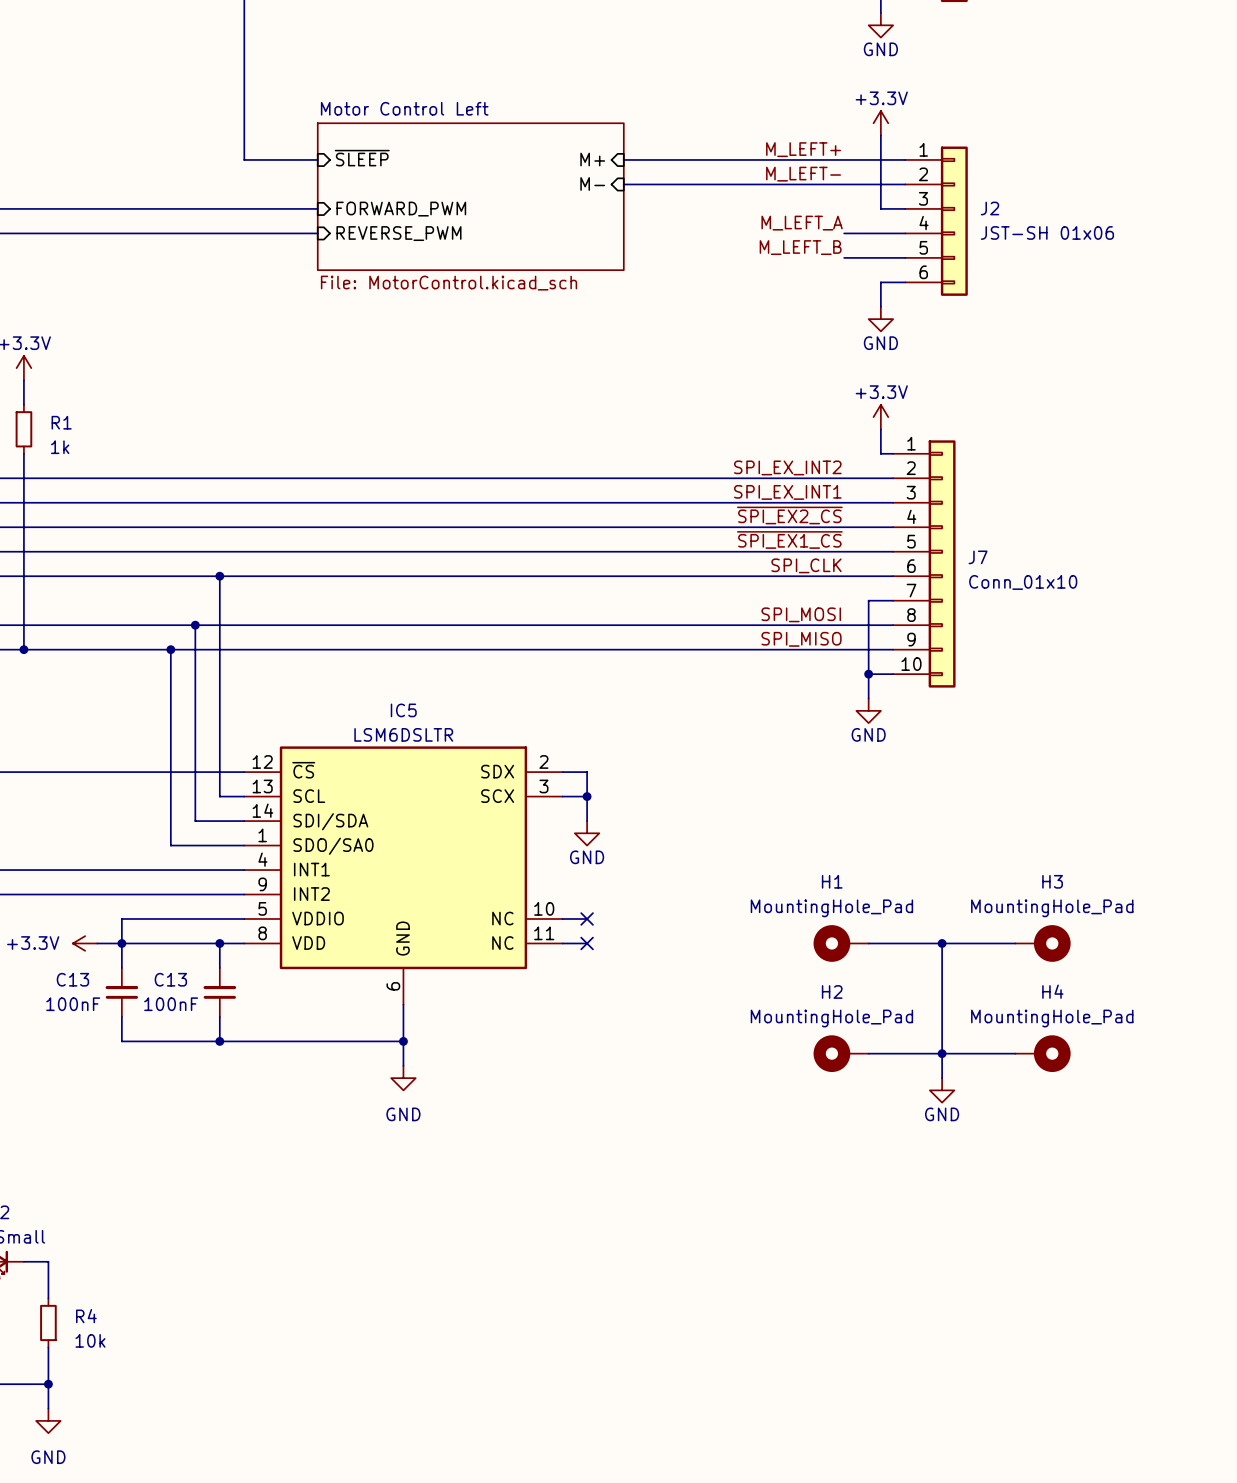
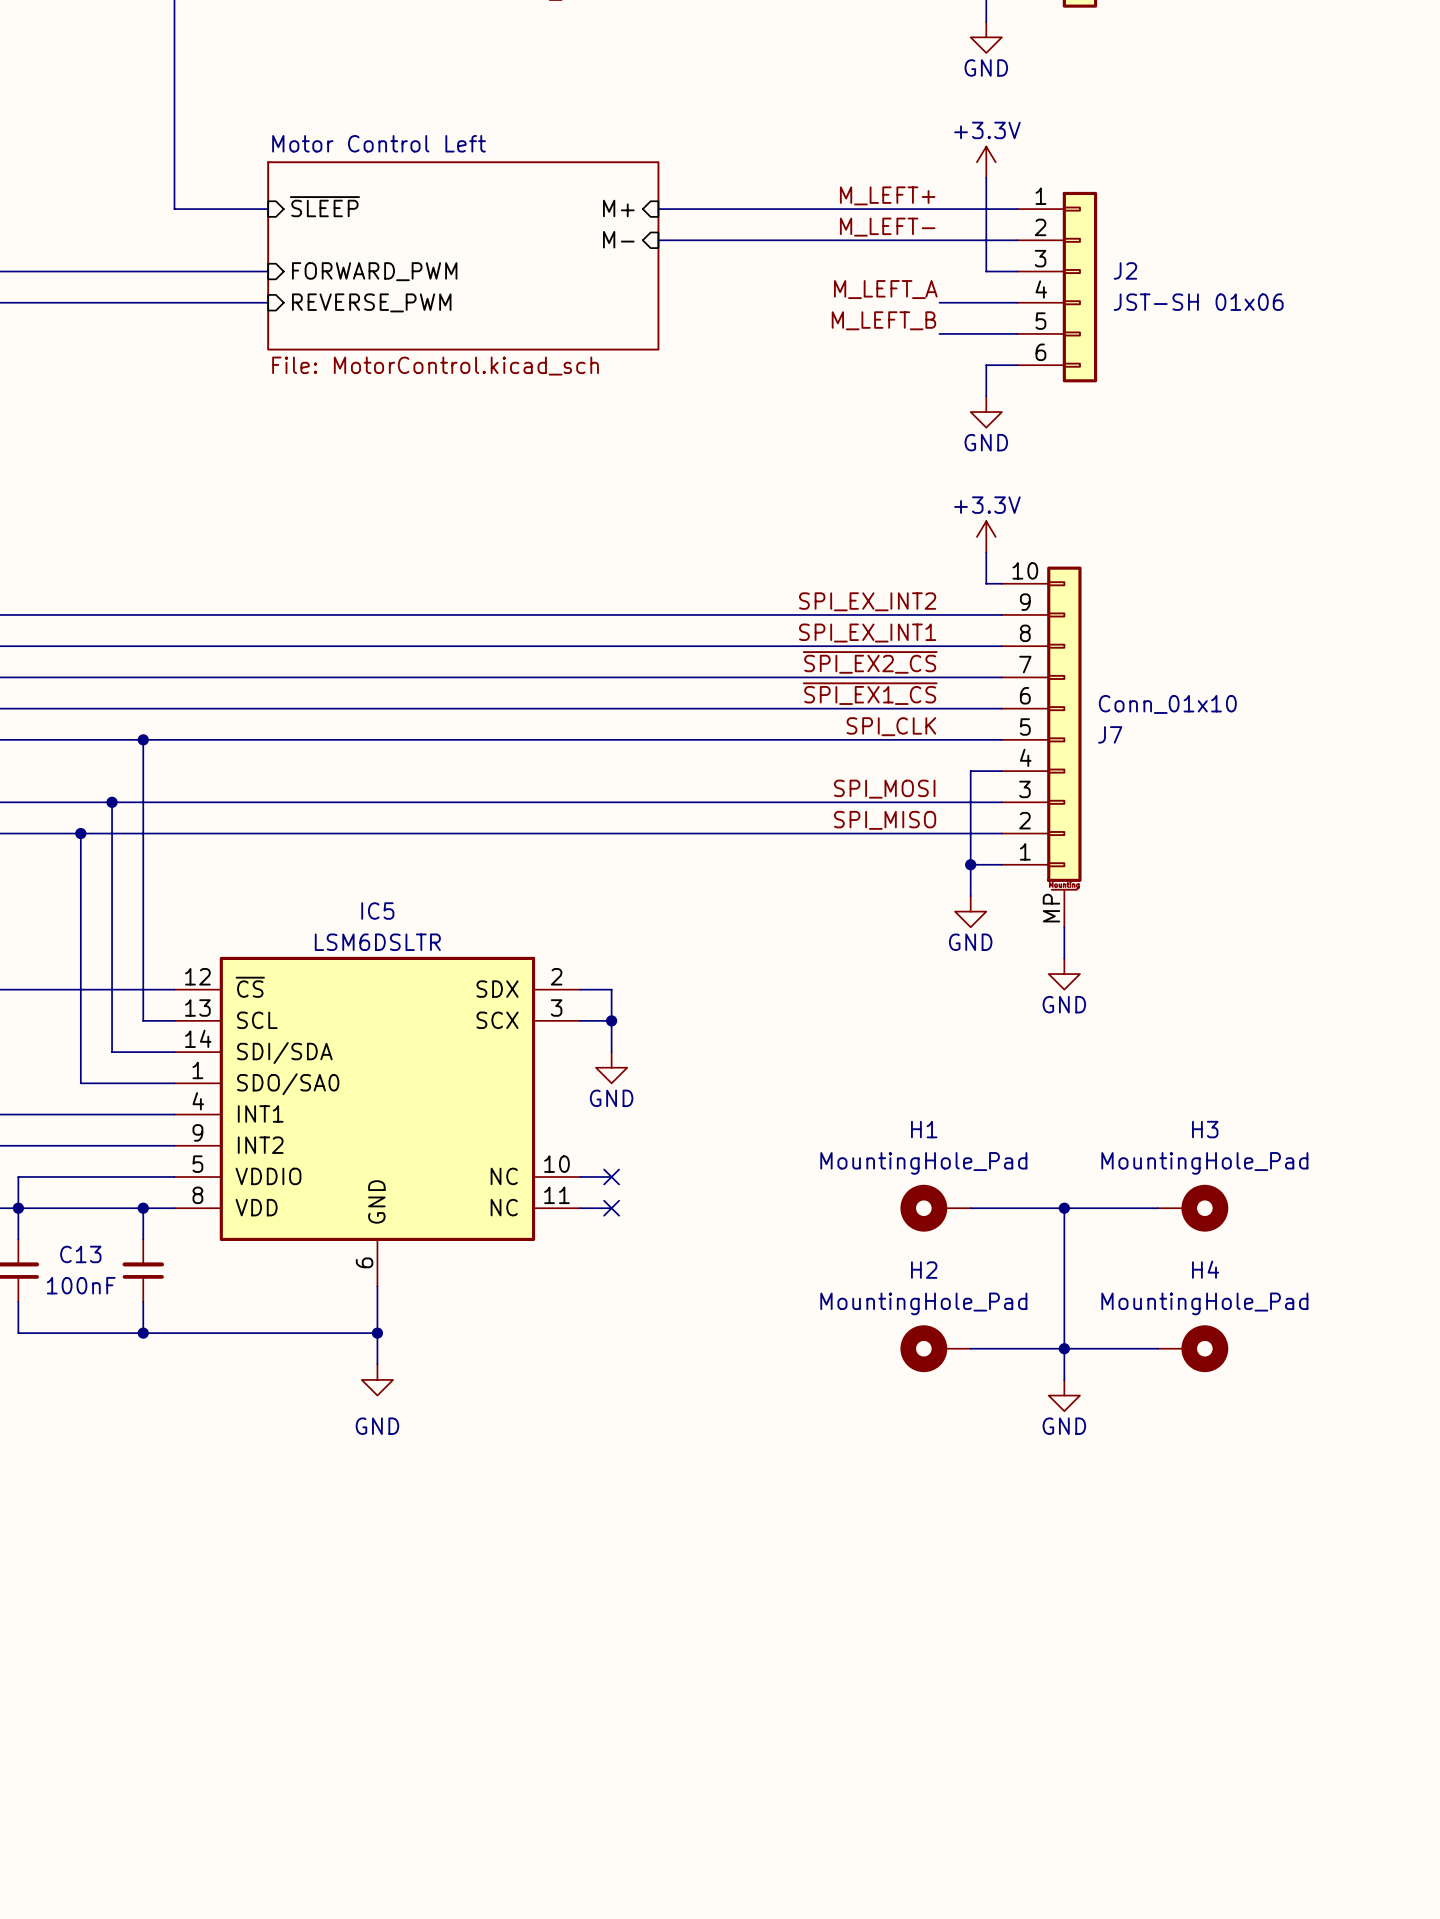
J7 symbol: [893, 440, 956, 688] -> [1001, 566, 1082, 928]
J7 value position: Conn_01x10 (1023, 582) -> Conn_01x10 (1167, 704)
wire: none -> (1064, 927) (1064, 958)
power symbol: none -> GND (1064, 974)

